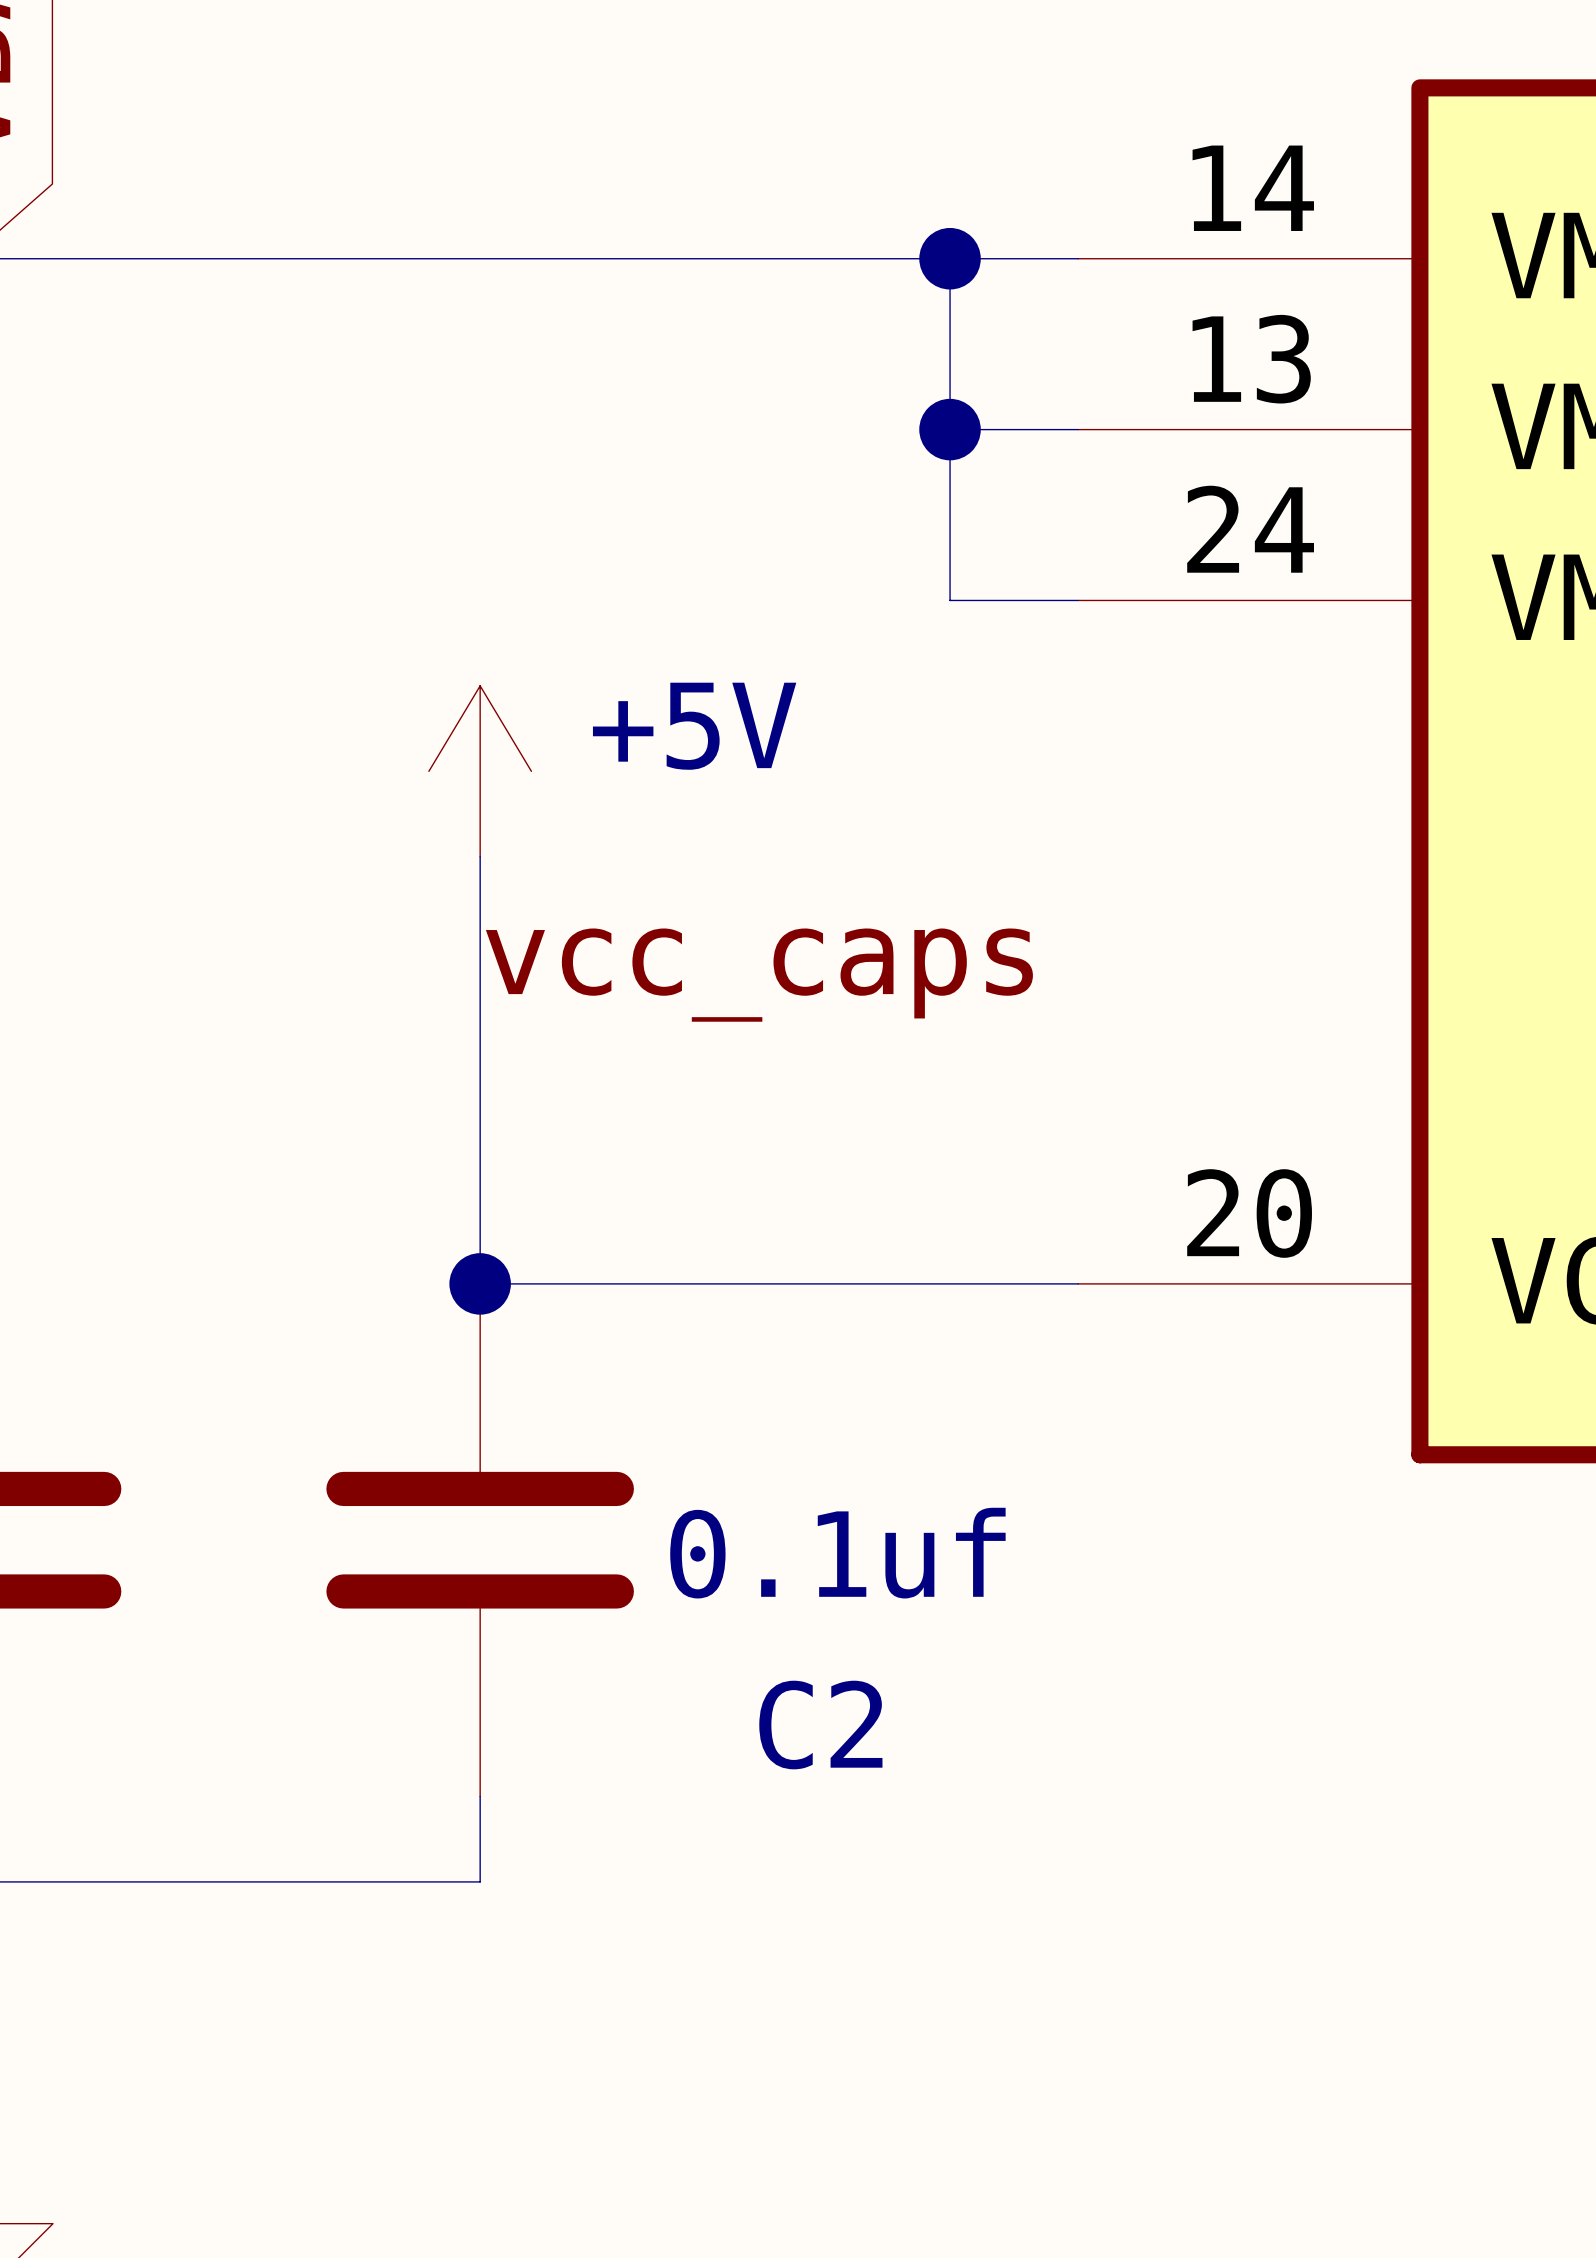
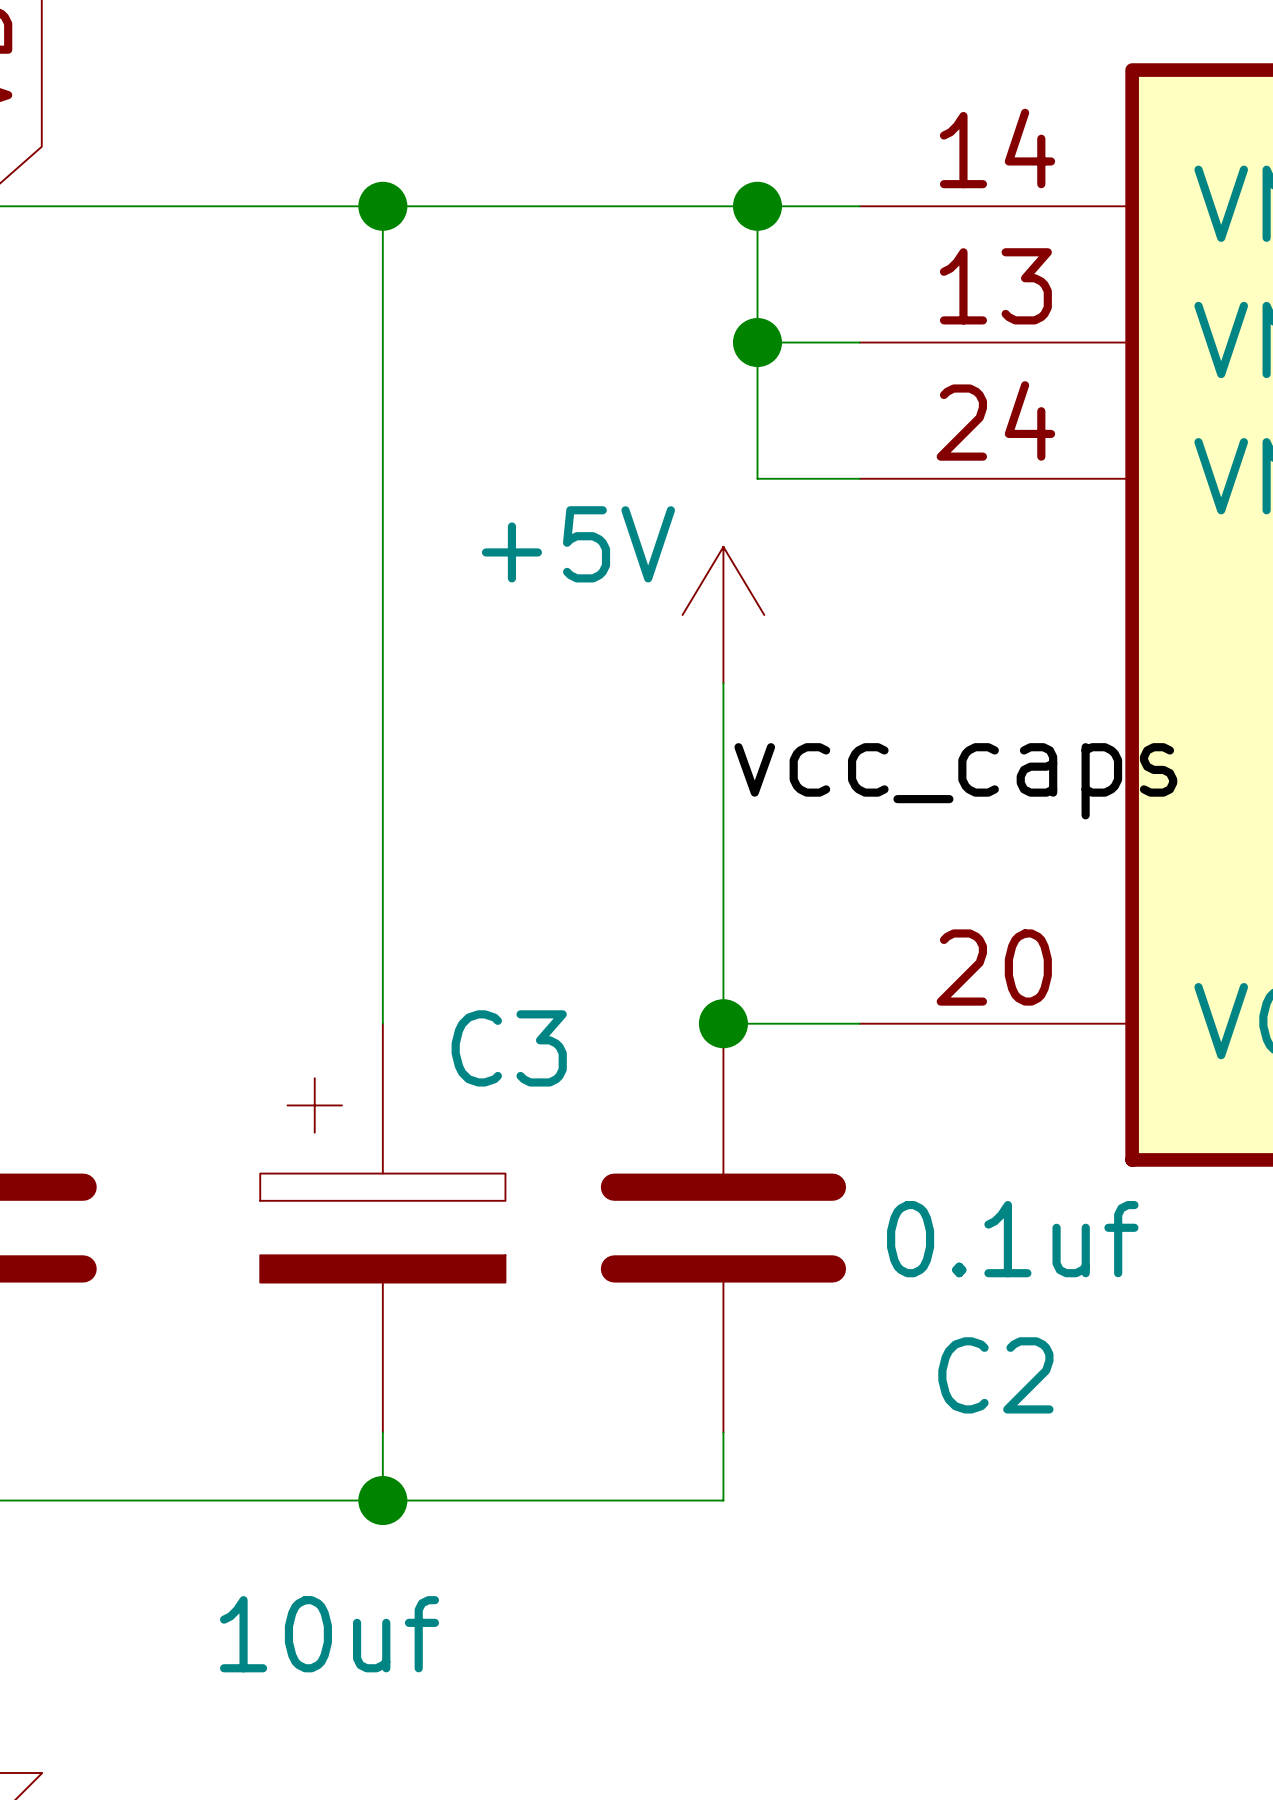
wire: none -> (382, 206) (382, 683)
junction: none -> (382, 206)
power symbol text position: +5V (694, 726) -> +5V (578, 544)
power symbol position: +5V (480, 771) -> +5V (723, 615)
label position: vcc_caps (759, 975) -> vcc_caps (955, 781)
wire: (480, 1283) (907, 1283) -> (723, 683) (723, 1023)
junction: (480, 1283) -> none
junction: none -> (723, 1023)
C2 position: (480, 1540) -> (723, 1228)
C3: none -> 10uf (382, 1228)
wire: none -> (723, 1432) (723, 1500) (382, 1500)
junction: none -> (382, 1500)

